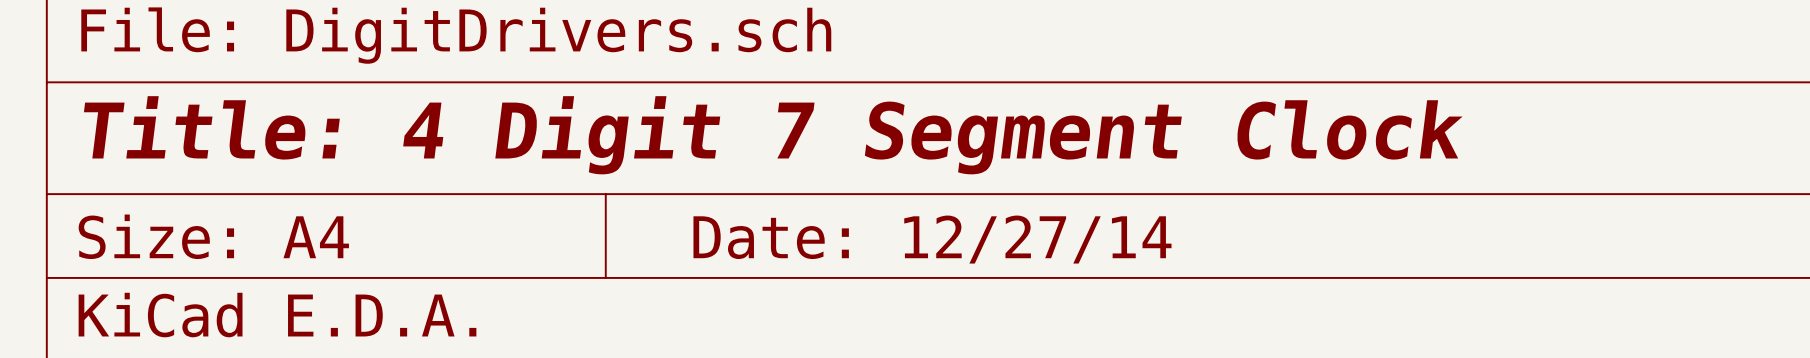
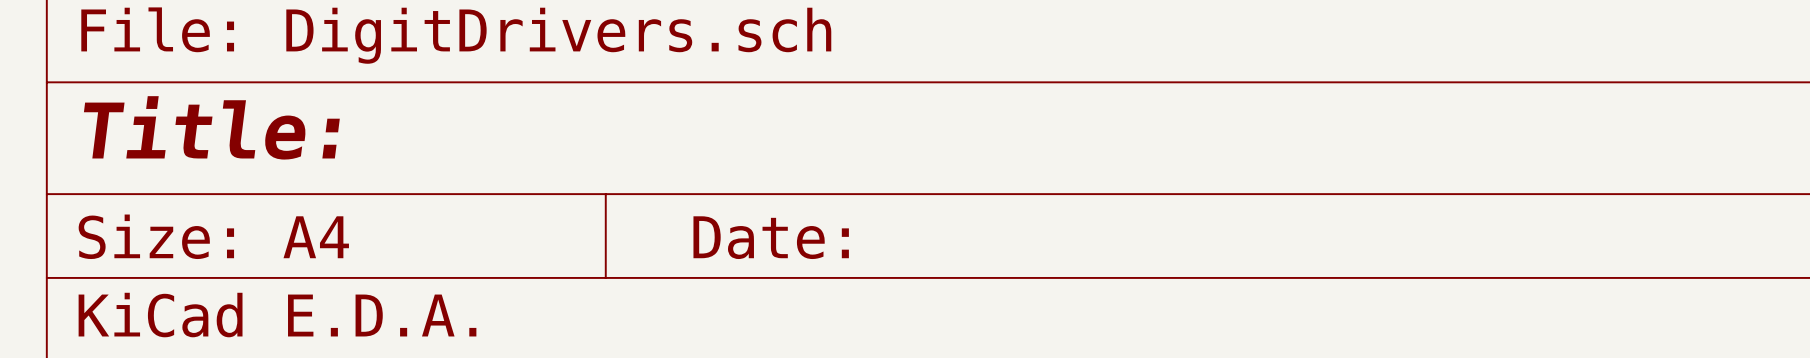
title block: Title: 4 Digit 7 Segment Clock (773, 135) -> Title: (211, 127)
title block: Date: 12/27/14 (932, 239) -> Date: (771, 237)

